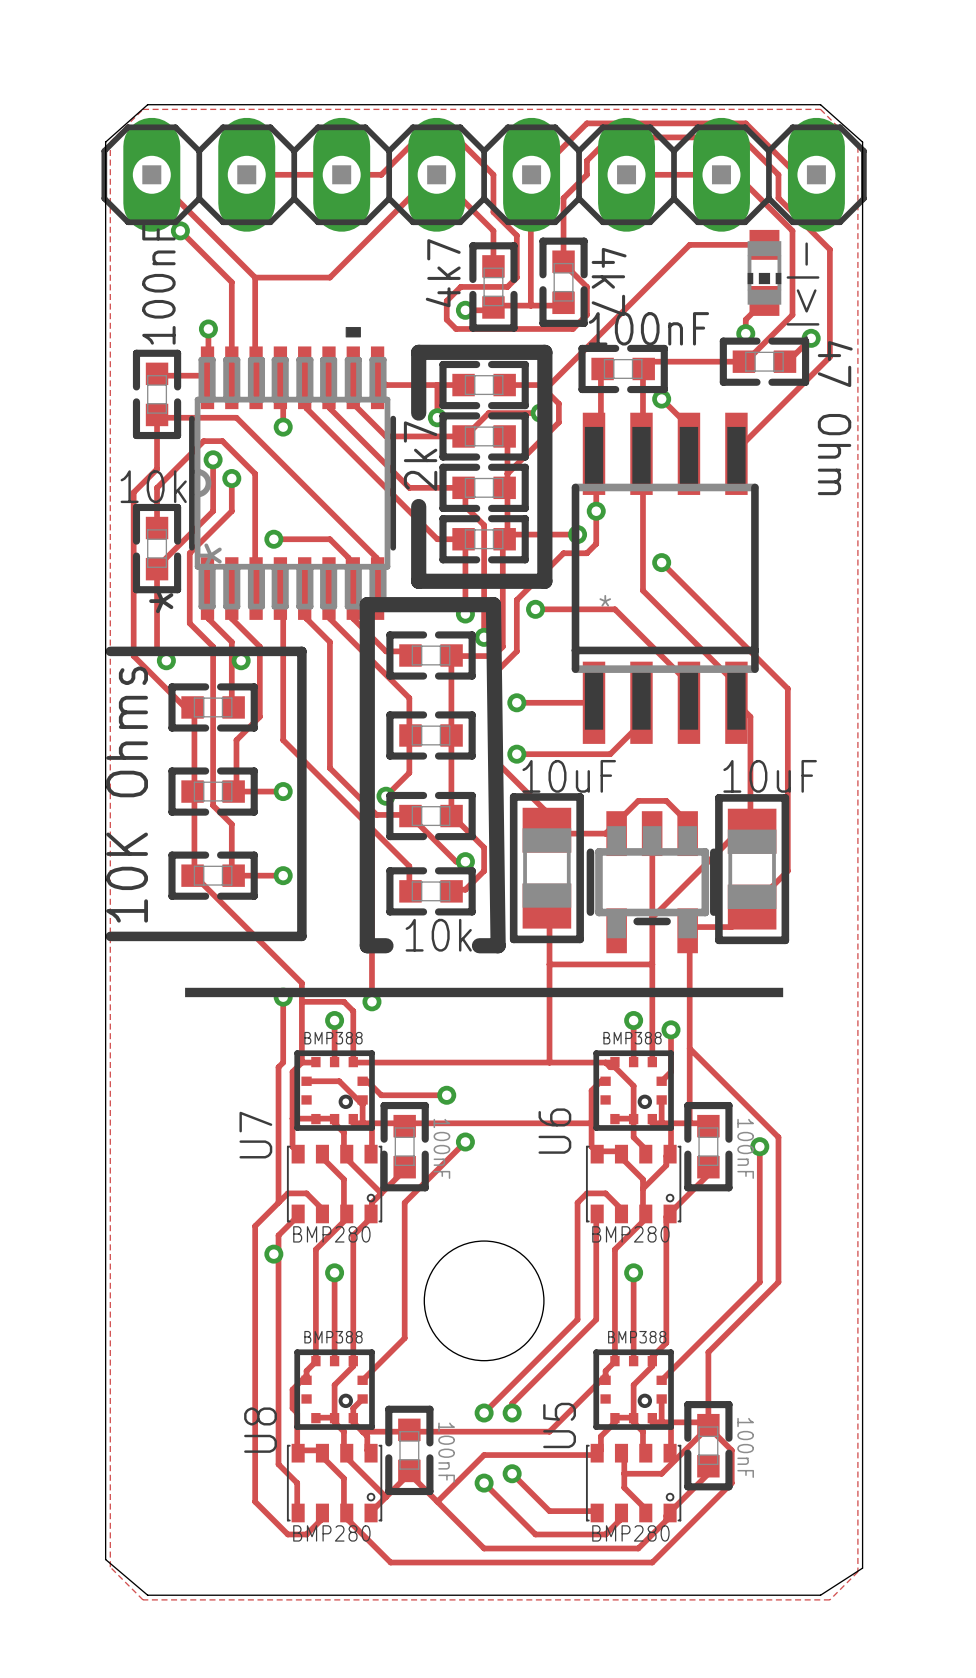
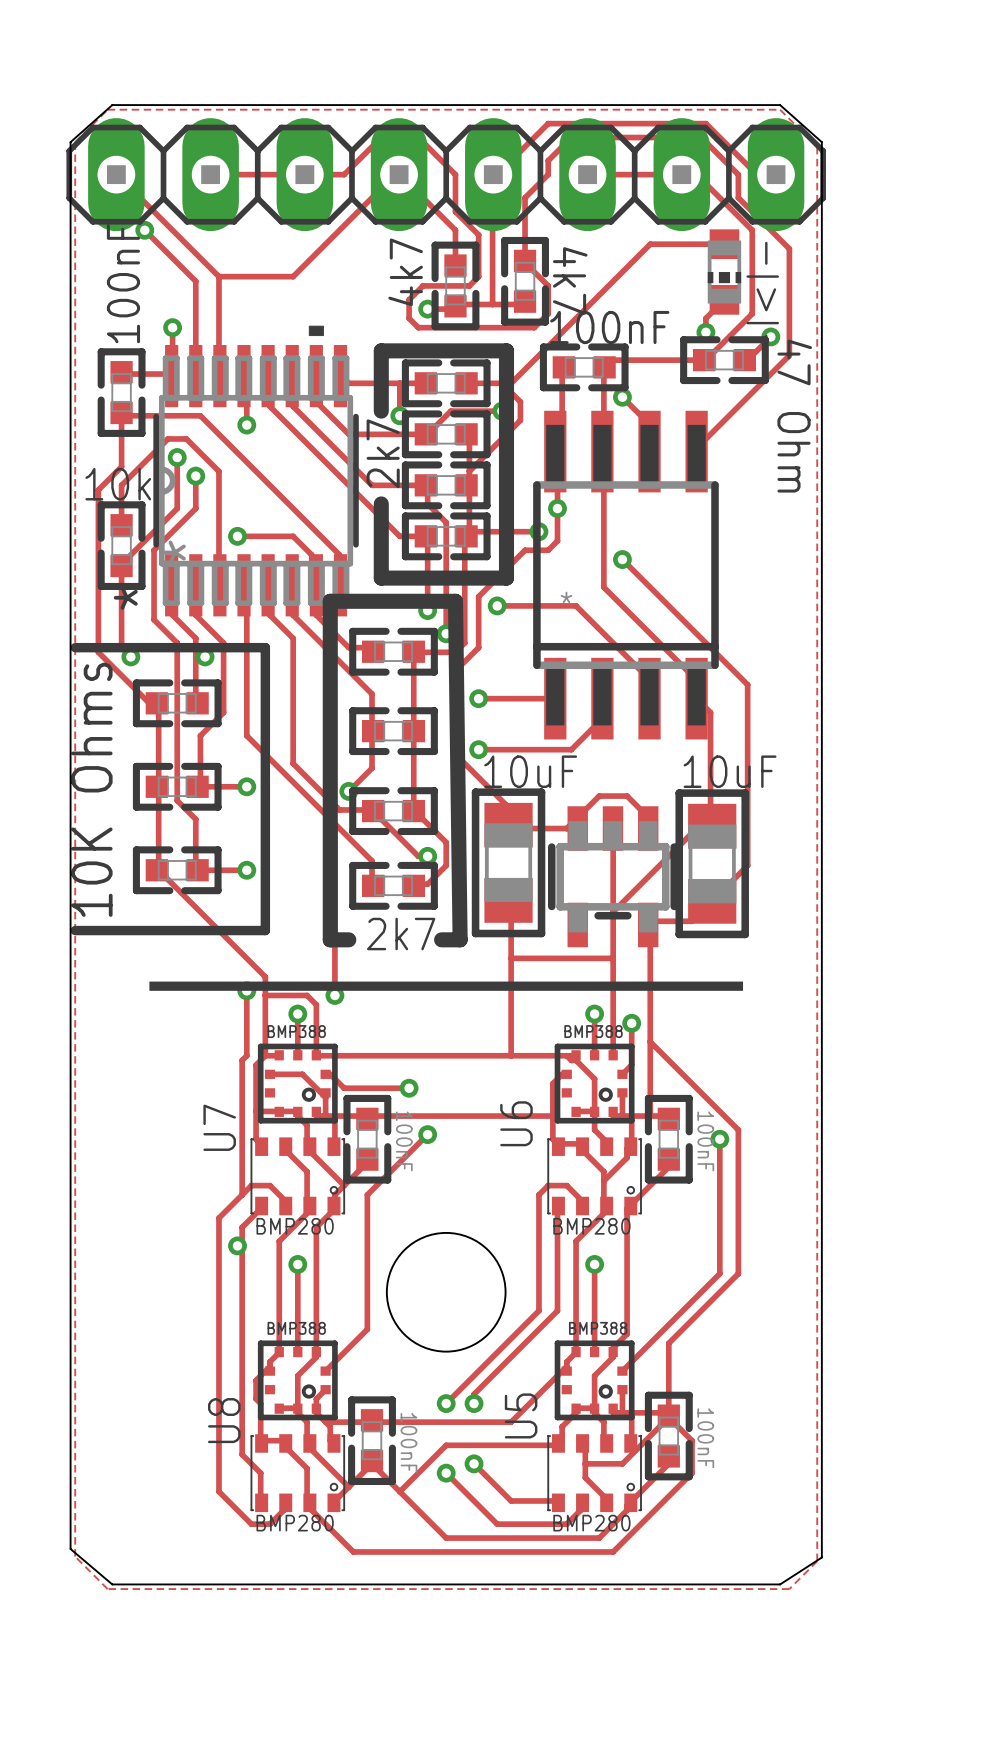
text: 10k (438, 935) -> 2k7 (401, 934)

